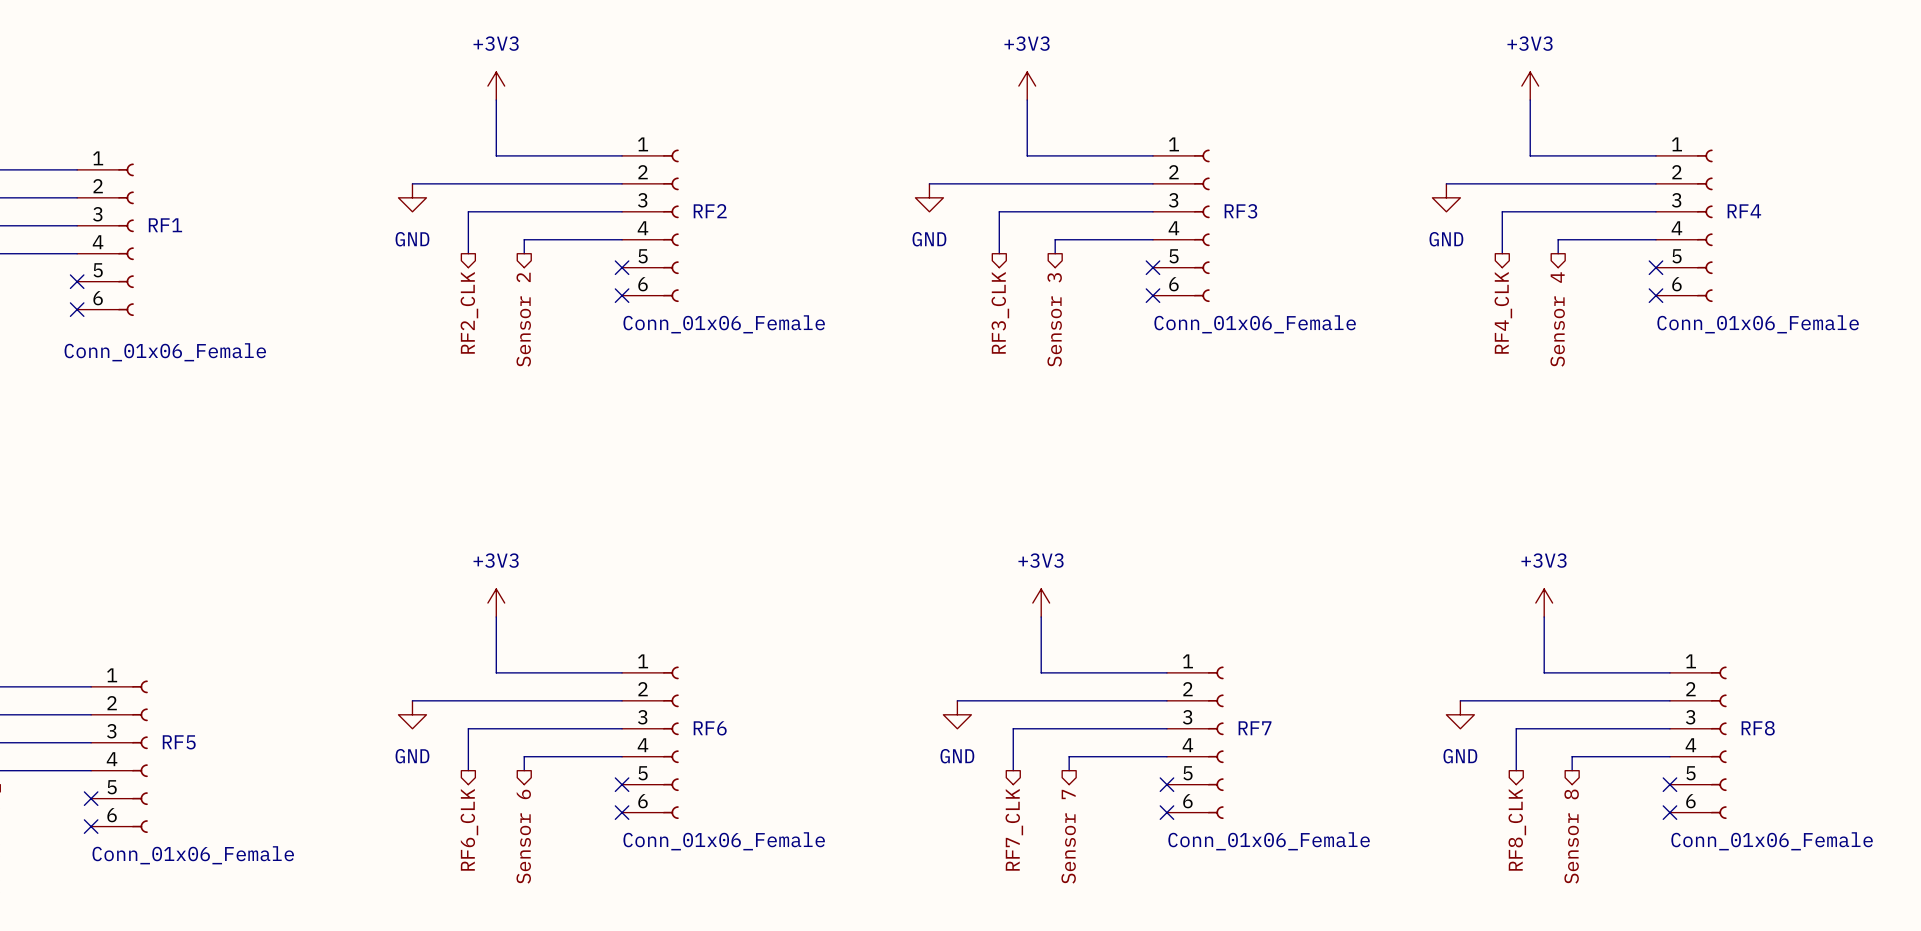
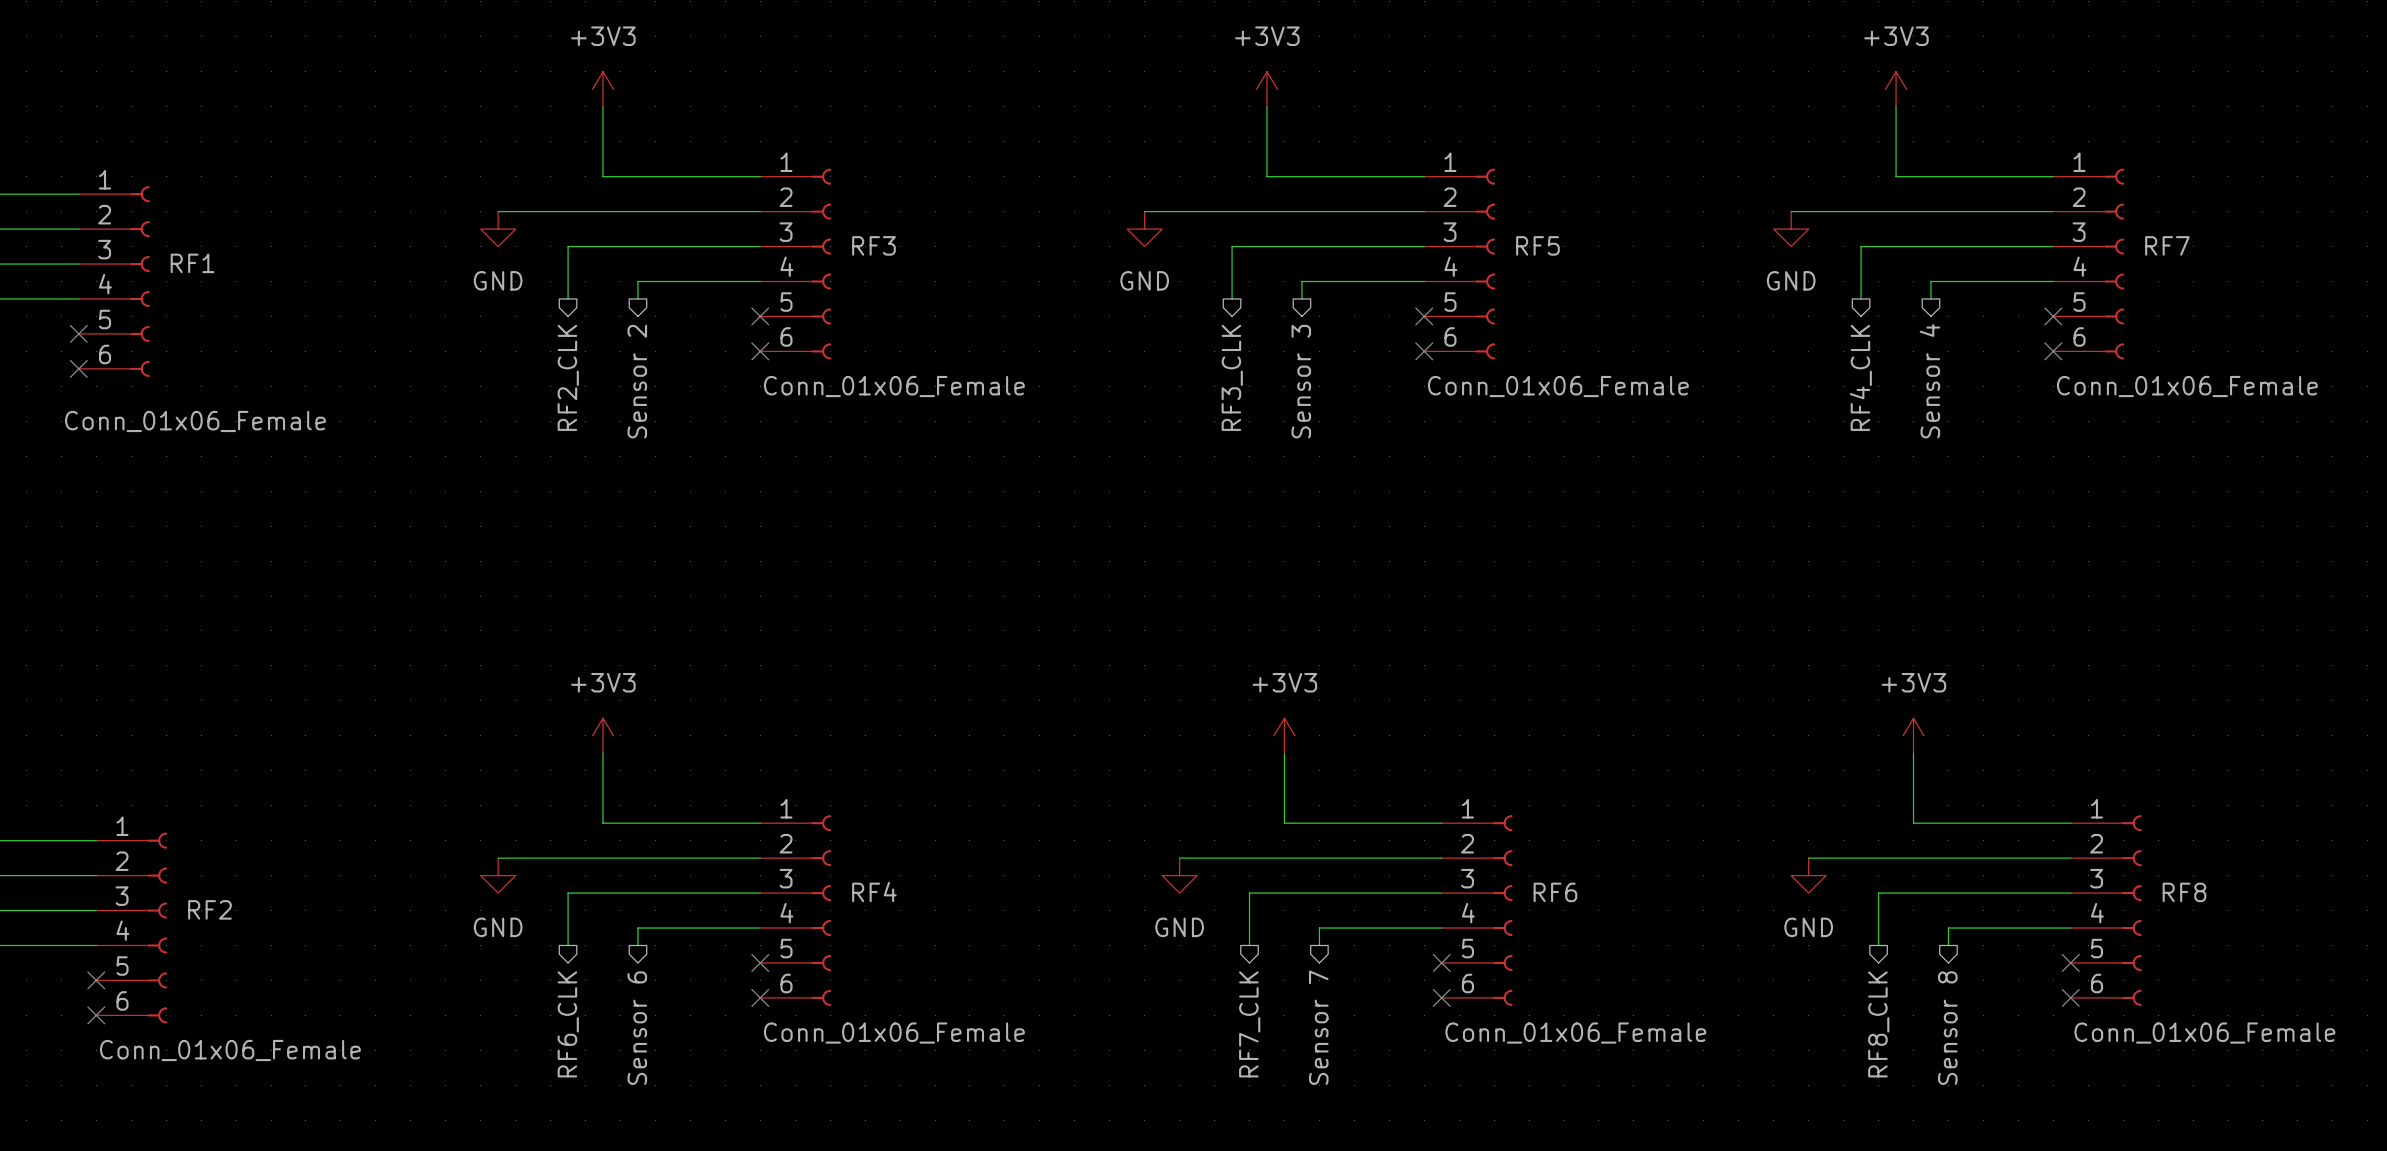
RF2 name: RF2 (710, 211) -> RF3 (873, 245)
RF3 name: RF3 (1240, 211) -> RF5 (1537, 245)
RF4 name: RF4 (1744, 211) -> RF7 (2167, 245)
RF6 name: RF6 (710, 728) -> RF4 (874, 892)
RF7 name: RF7 (1255, 728) -> RF6 (1555, 892)
RF5 name: RF5 (179, 742) -> RF2 (209, 909)

